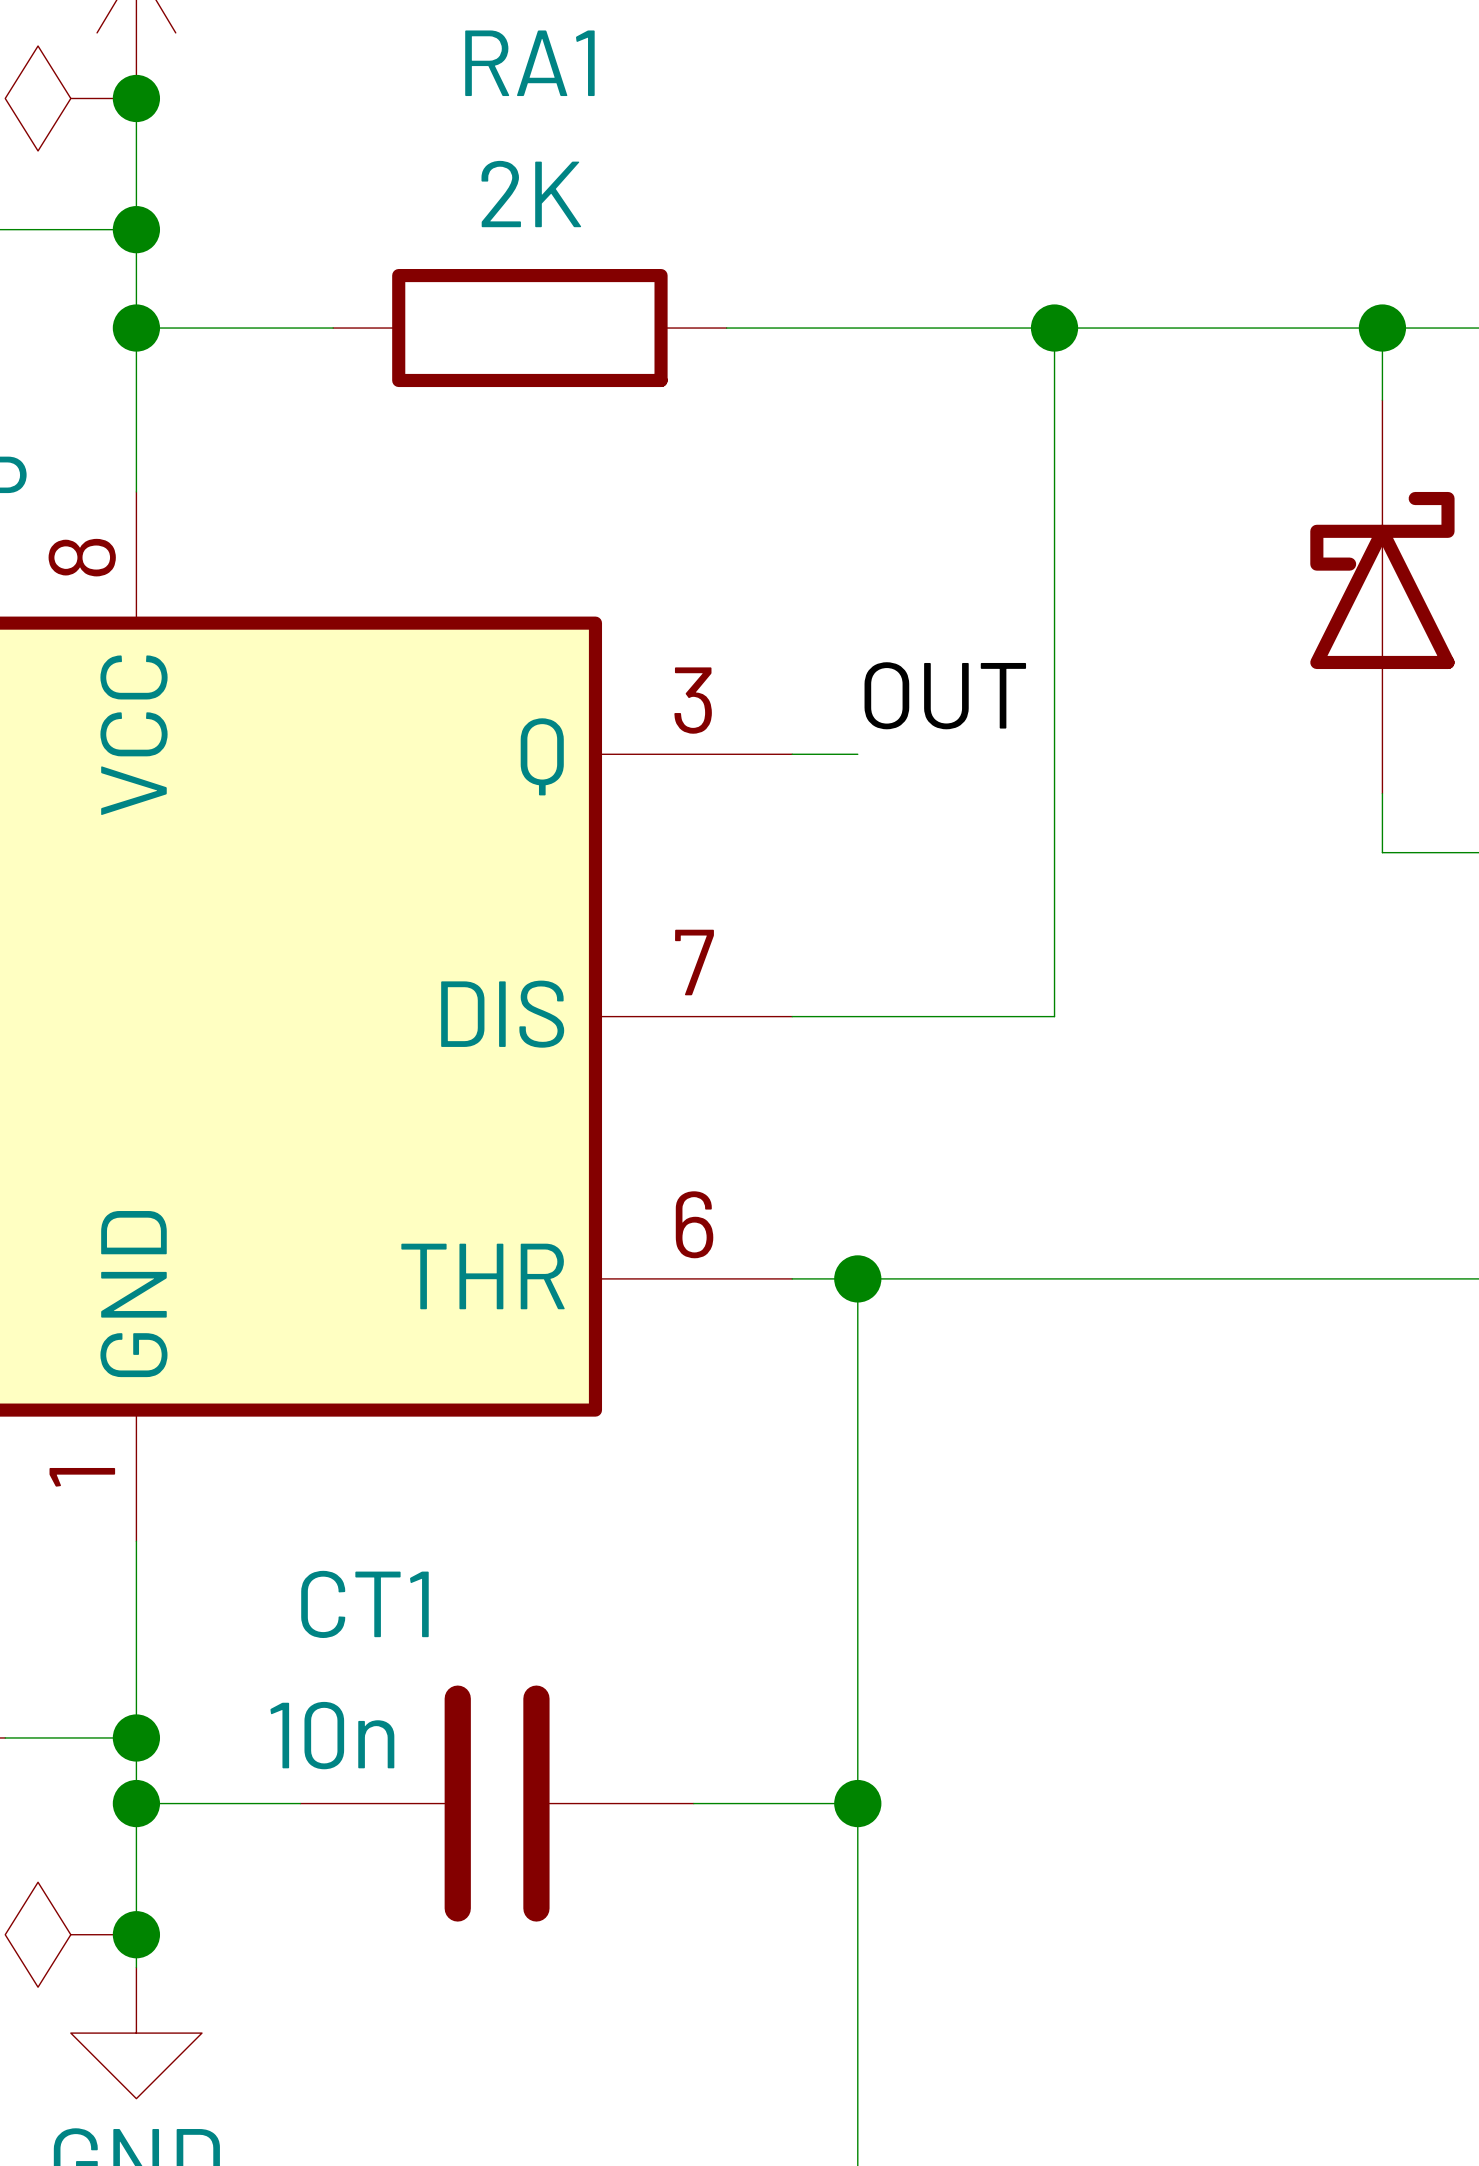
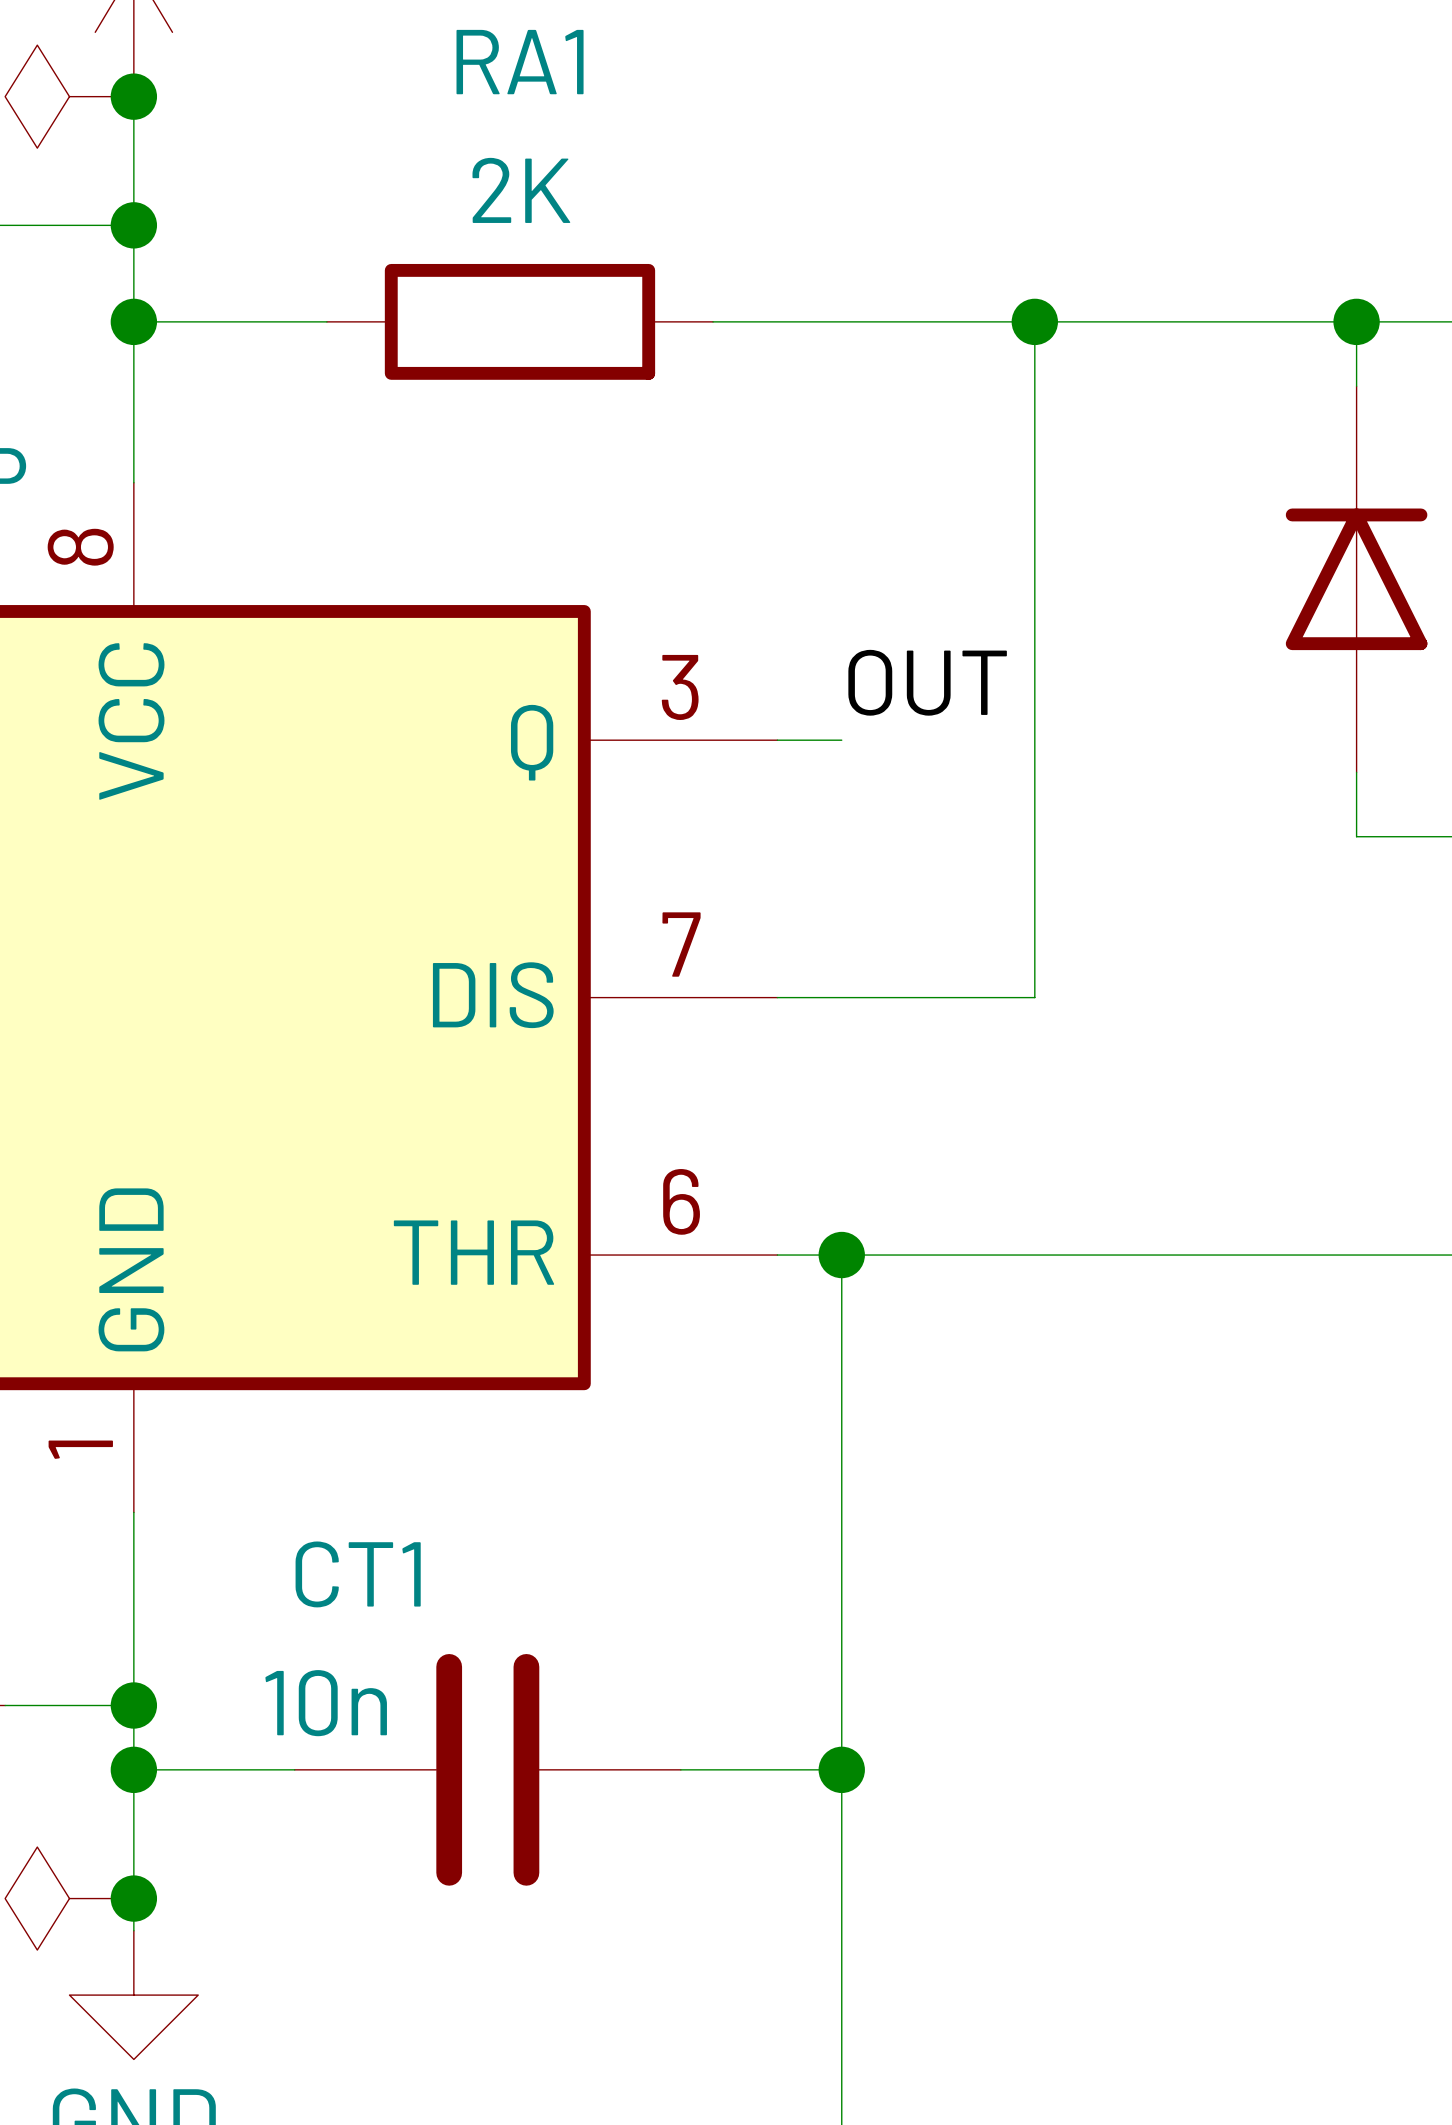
part symbol: [1310, 400, 1455, 794] -> [1285, 386, 1428, 773]

